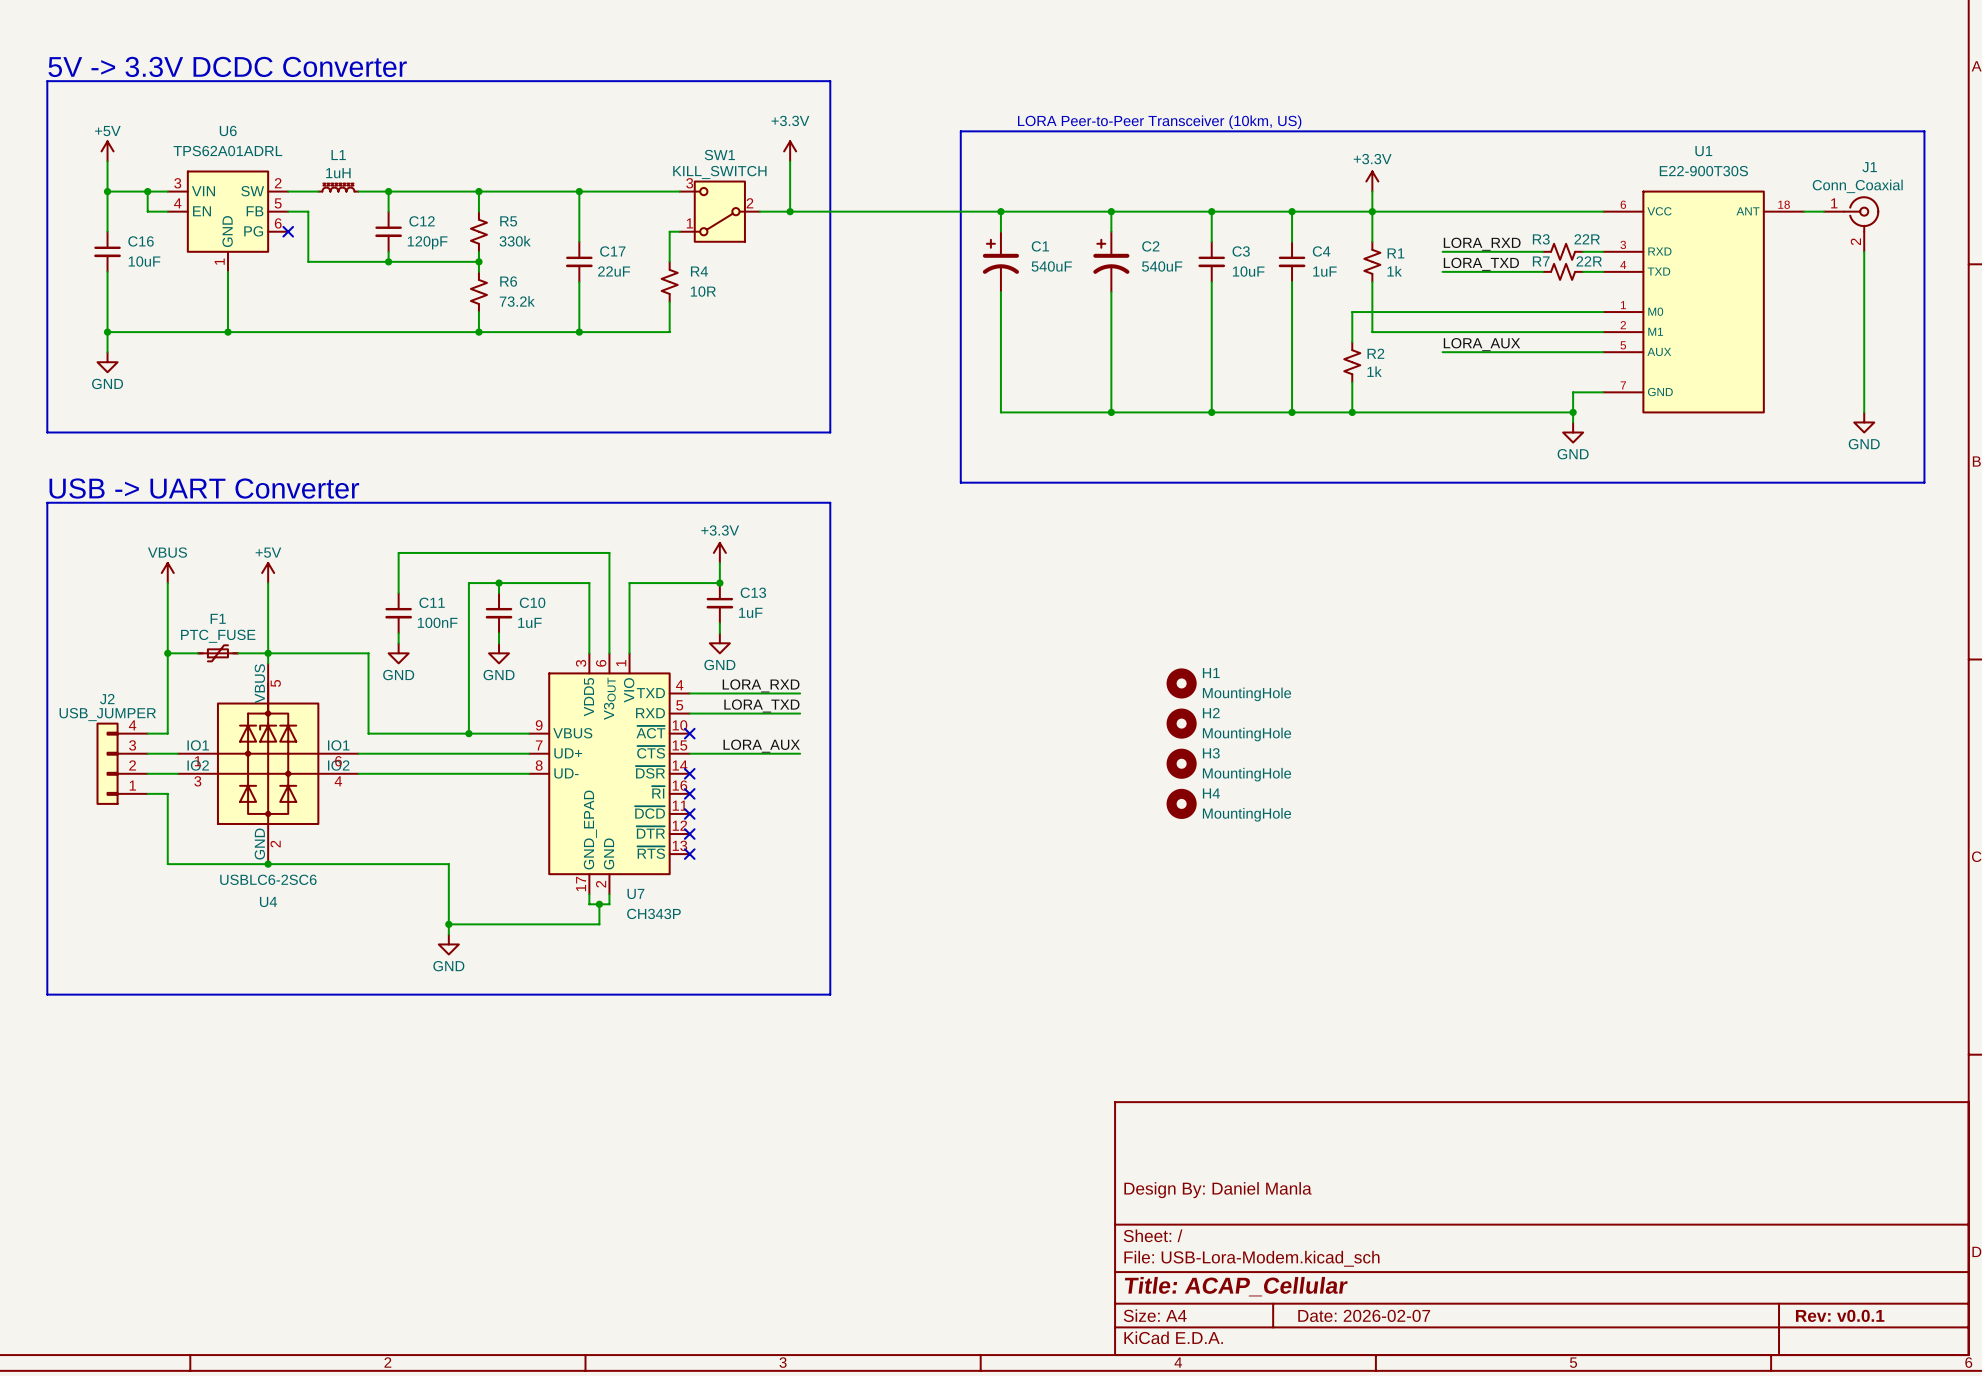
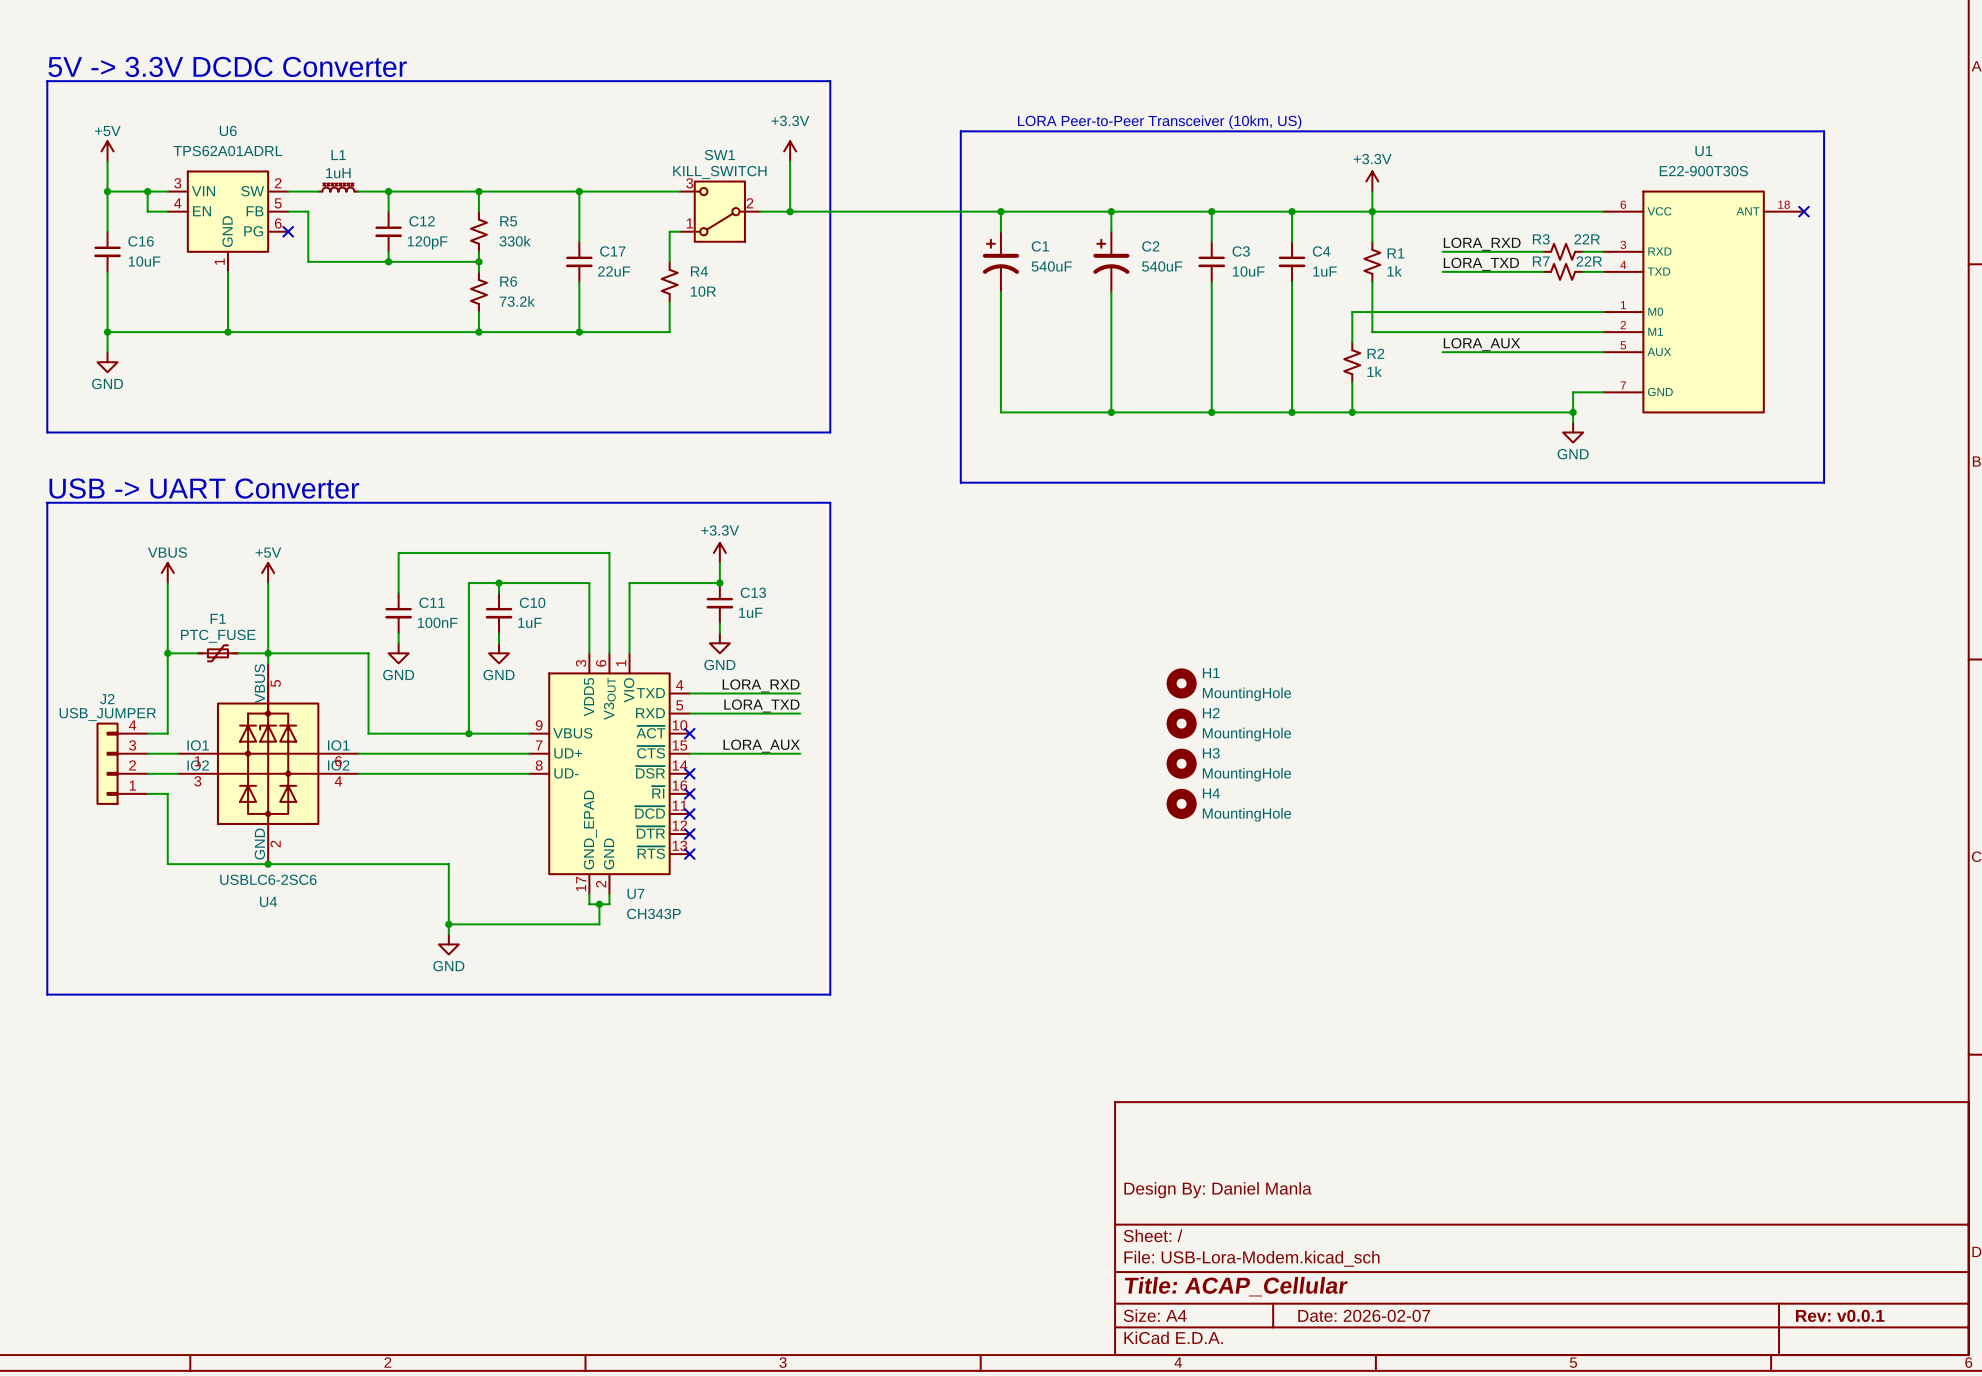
line: (1824, 131) (1924, 131) (1924, 482) (1824, 482) -> (1824, 131) (1824, 482)
wire: (1803, 211) (1824, 211) -> none
no-connect mark: none -> (1803, 211)
J1: Conn_Coaxial (1851, 224) -> none
wire: (1864, 251) (1864, 412) -> none
power symbol: GND (1864, 422) -> none

